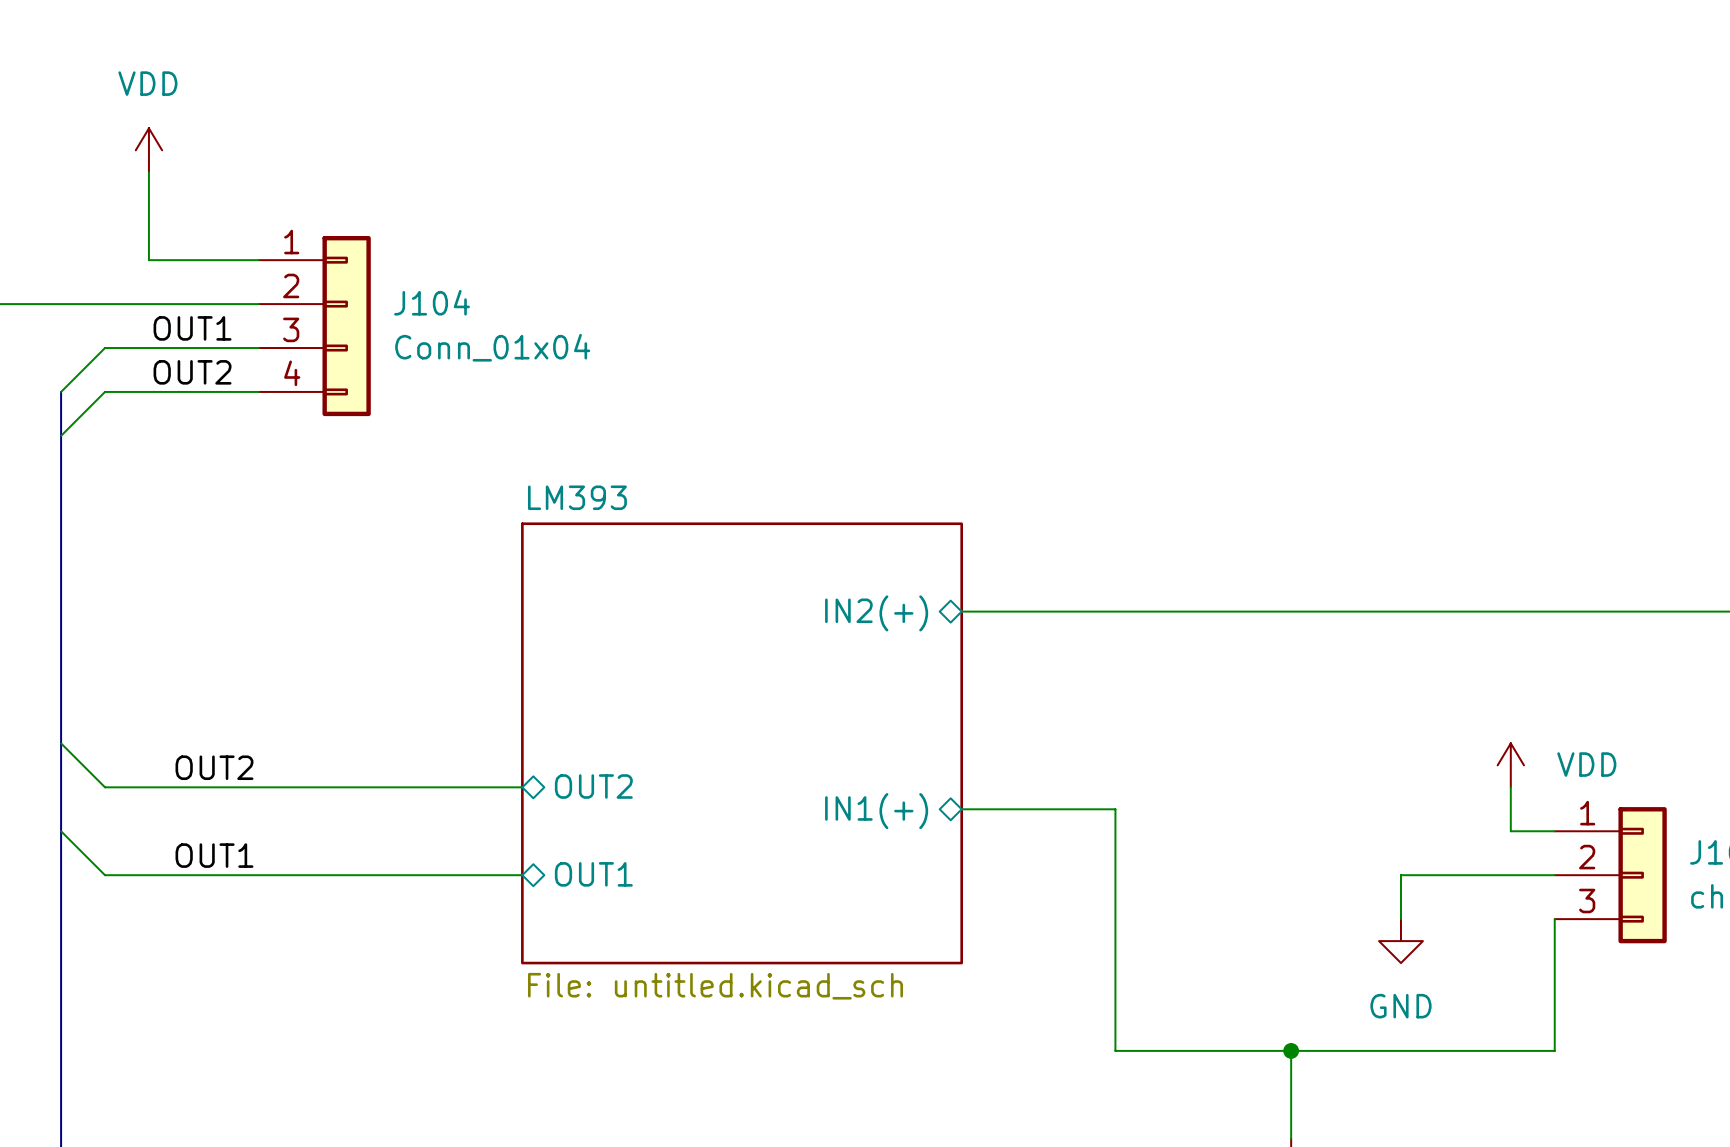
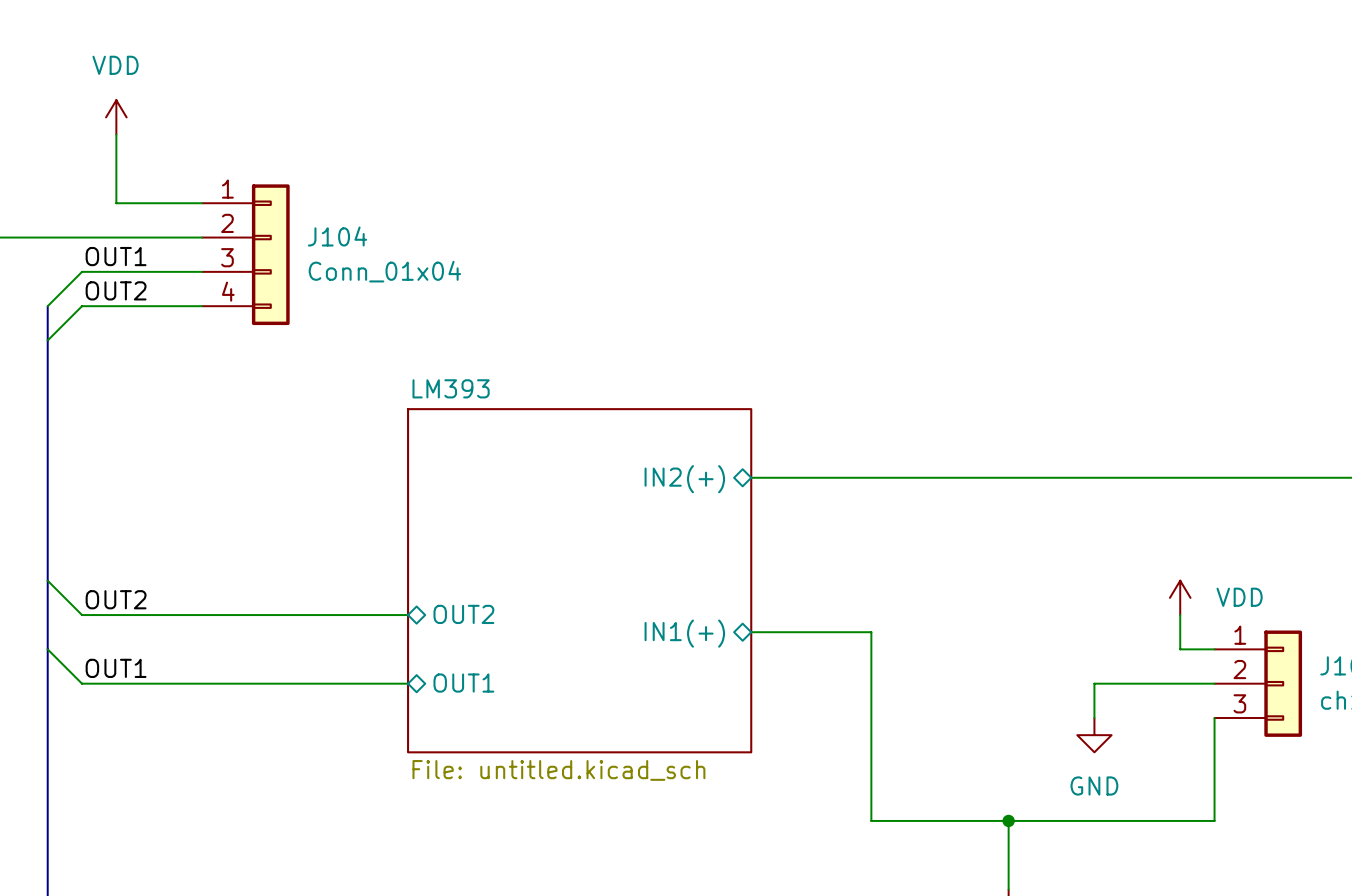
label position: OUT1 (192, 328) -> OUT1 (116, 256)
label position: OUT2 (192, 372) -> OUT2 (116, 290)
label position: OUT2 (214, 767) -> OUT2 (116, 599)
label position: OUT1 (214, 855) -> OUT1 (116, 668)

